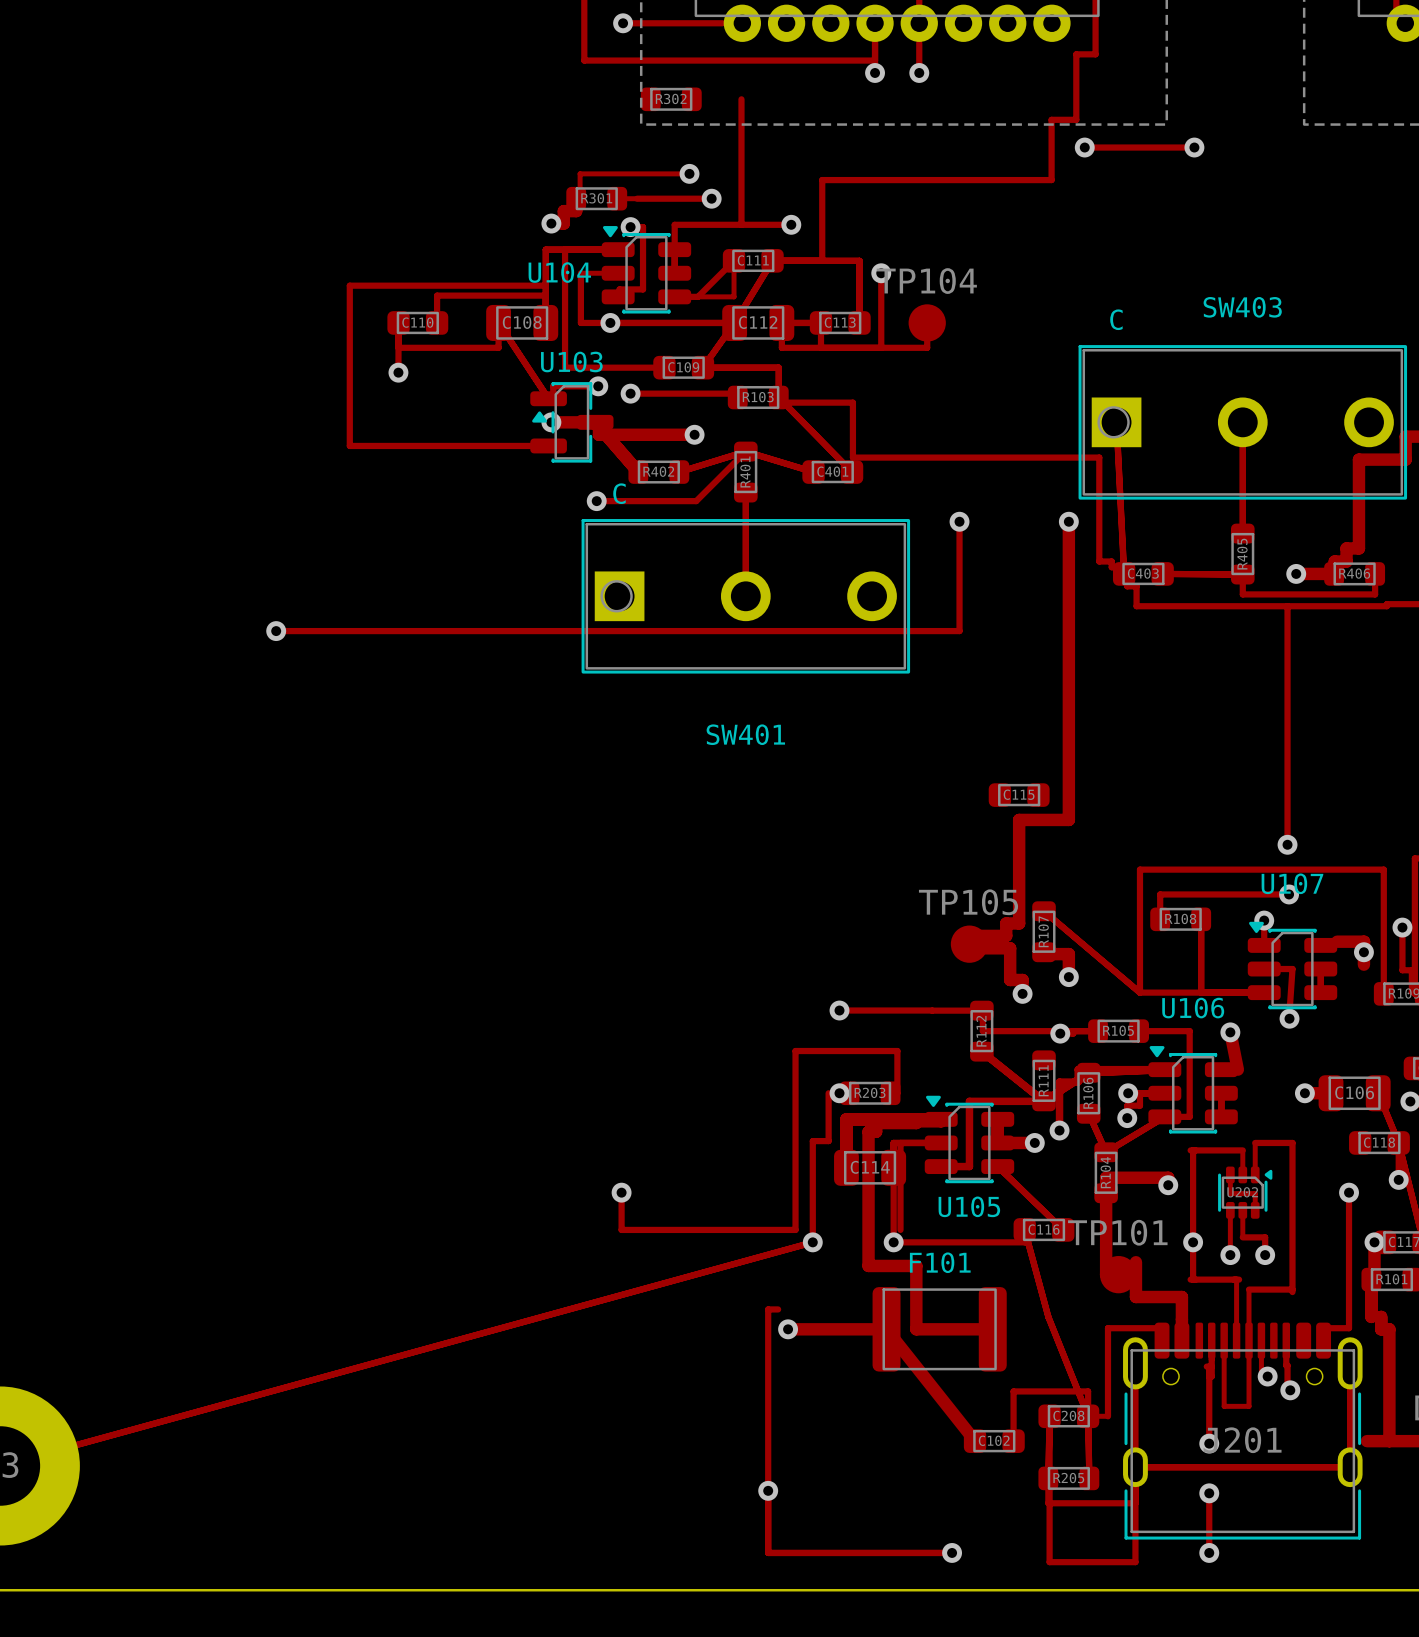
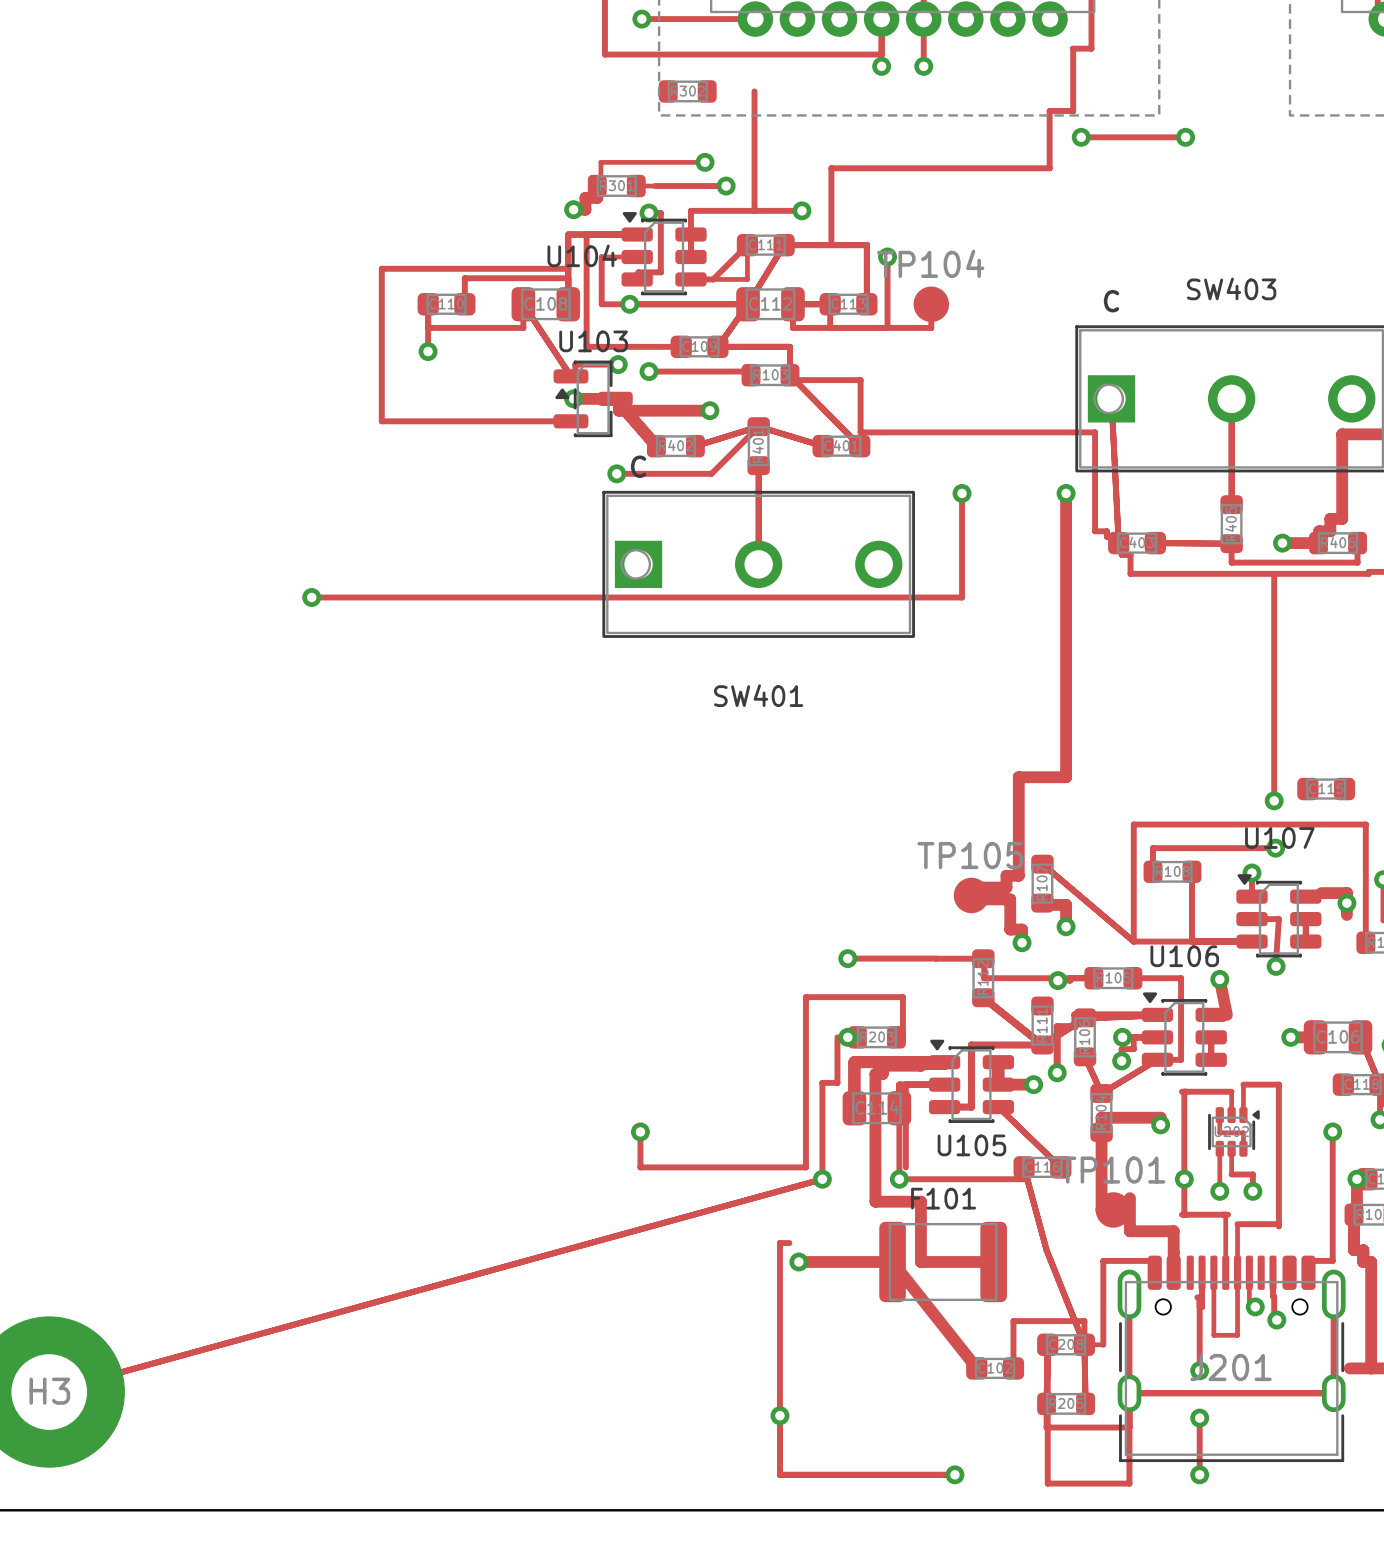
C115 position: (1019, 795) -> (1326, 789)

